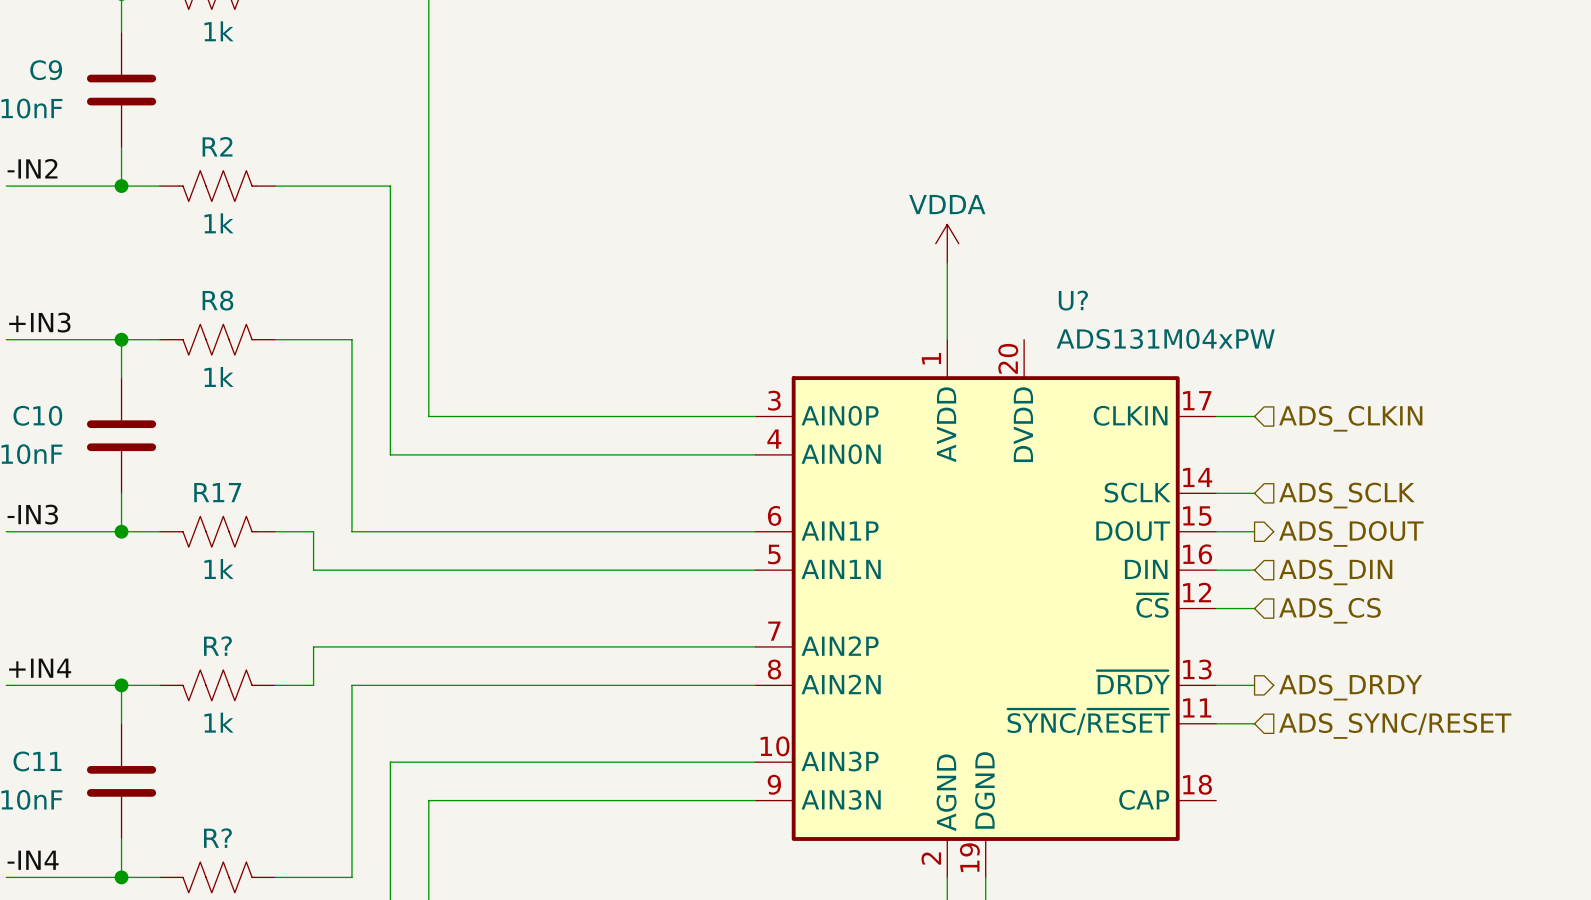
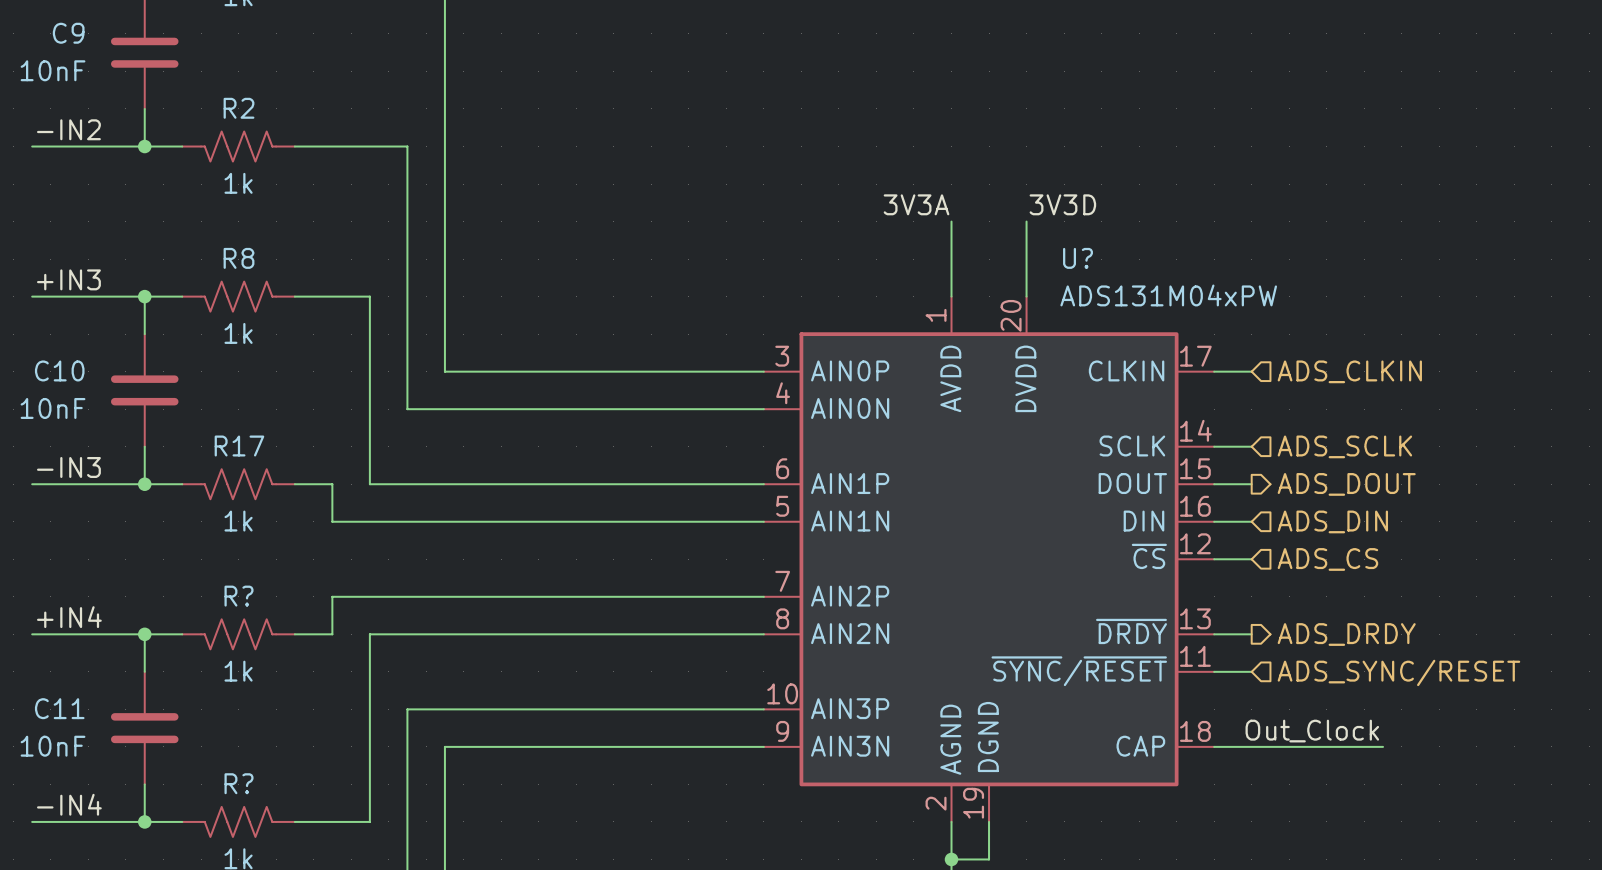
power symbol: VDDA (947, 243) -> none
label: none -> 3V3A (916, 204)
label: none -> 3V3D (1062, 204)
wire: none -> (1026, 221) (1026, 296)
label: none -> Out_Clock (1312, 731)
wire: none -> (1214, 746) (1383, 746)

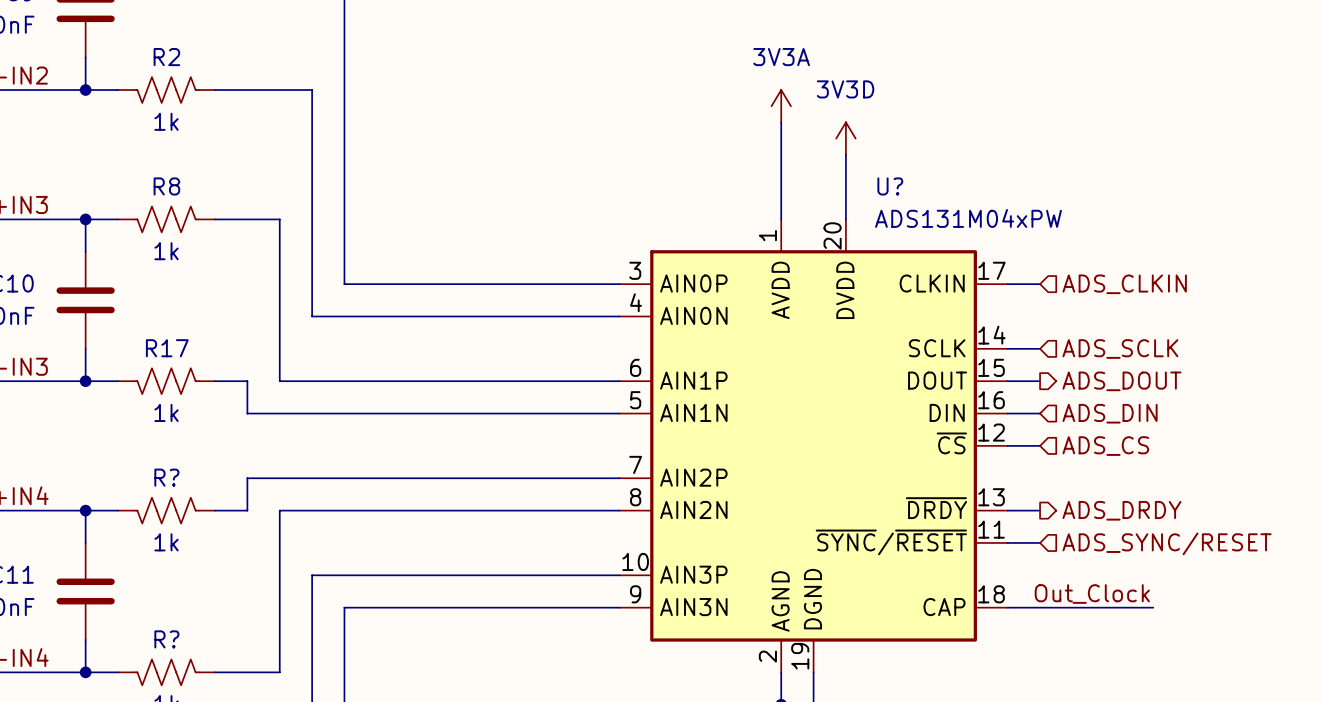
power symbol: none -> 3V3A (781, 106)
wire: none -> (781, 122) (781, 154)
power symbol: none -> 3V3D (845, 138)
label: 3V3A (916, 204) -> none
label: 3V3D (1062, 204) -> none

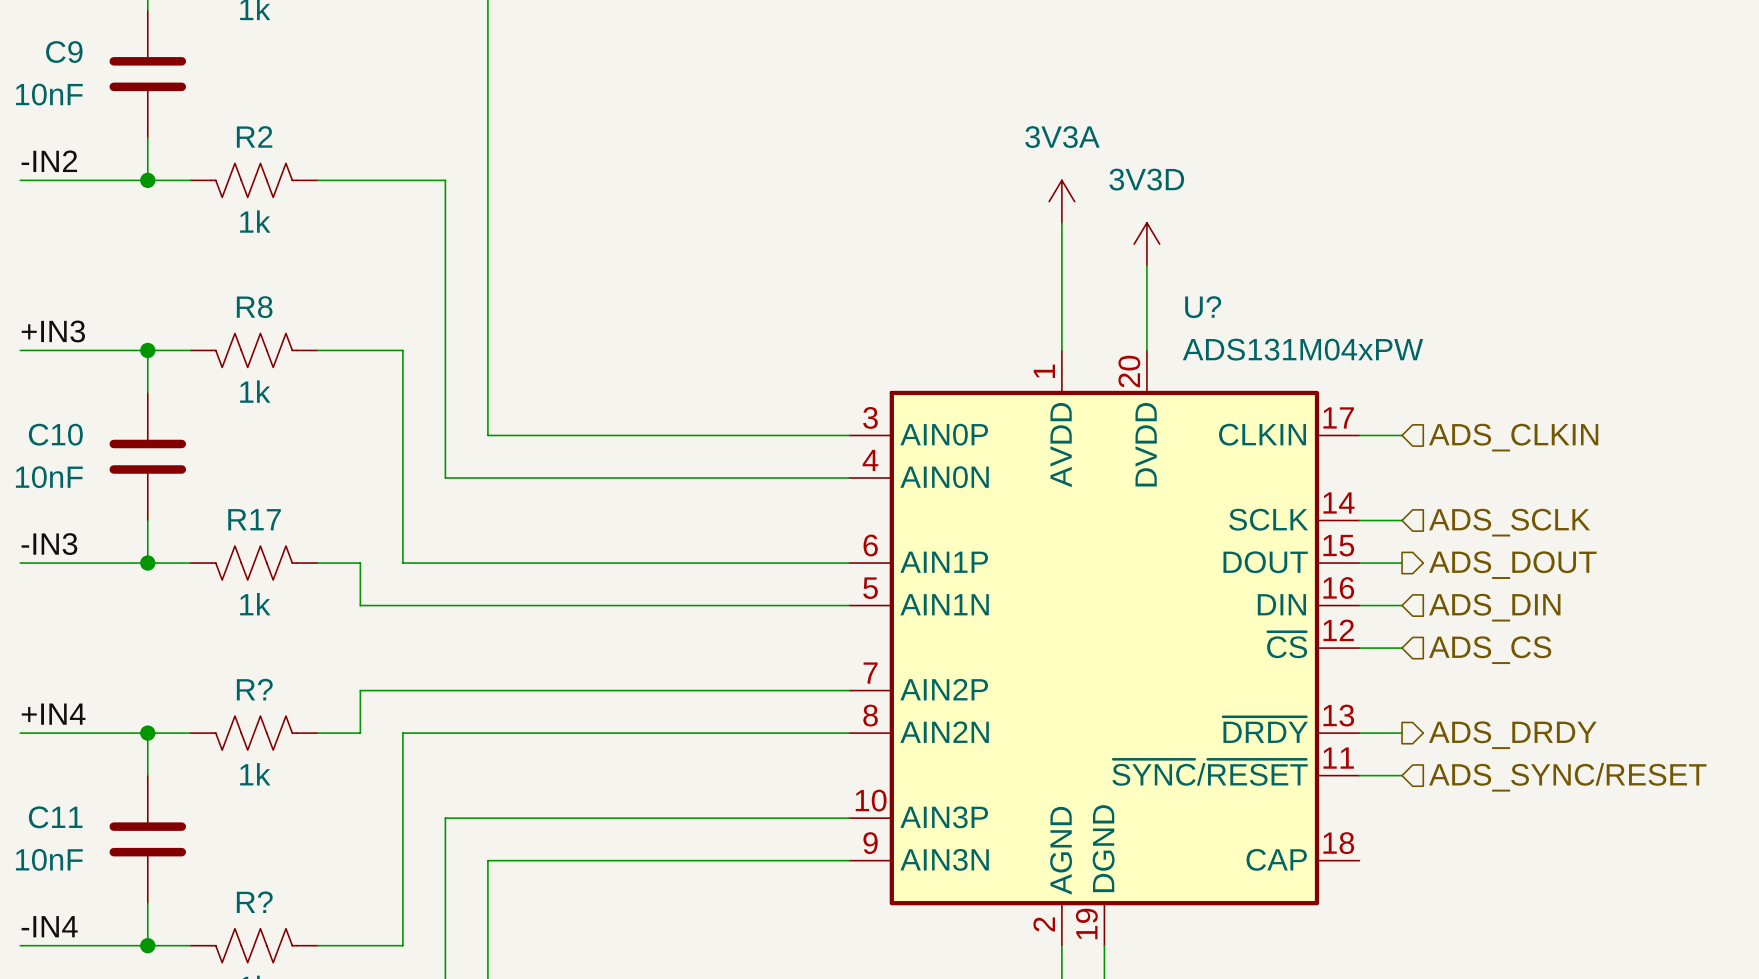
label: Out_Clock (1092, 594) -> none
wire: (1007, 607) (1153, 607) -> none

